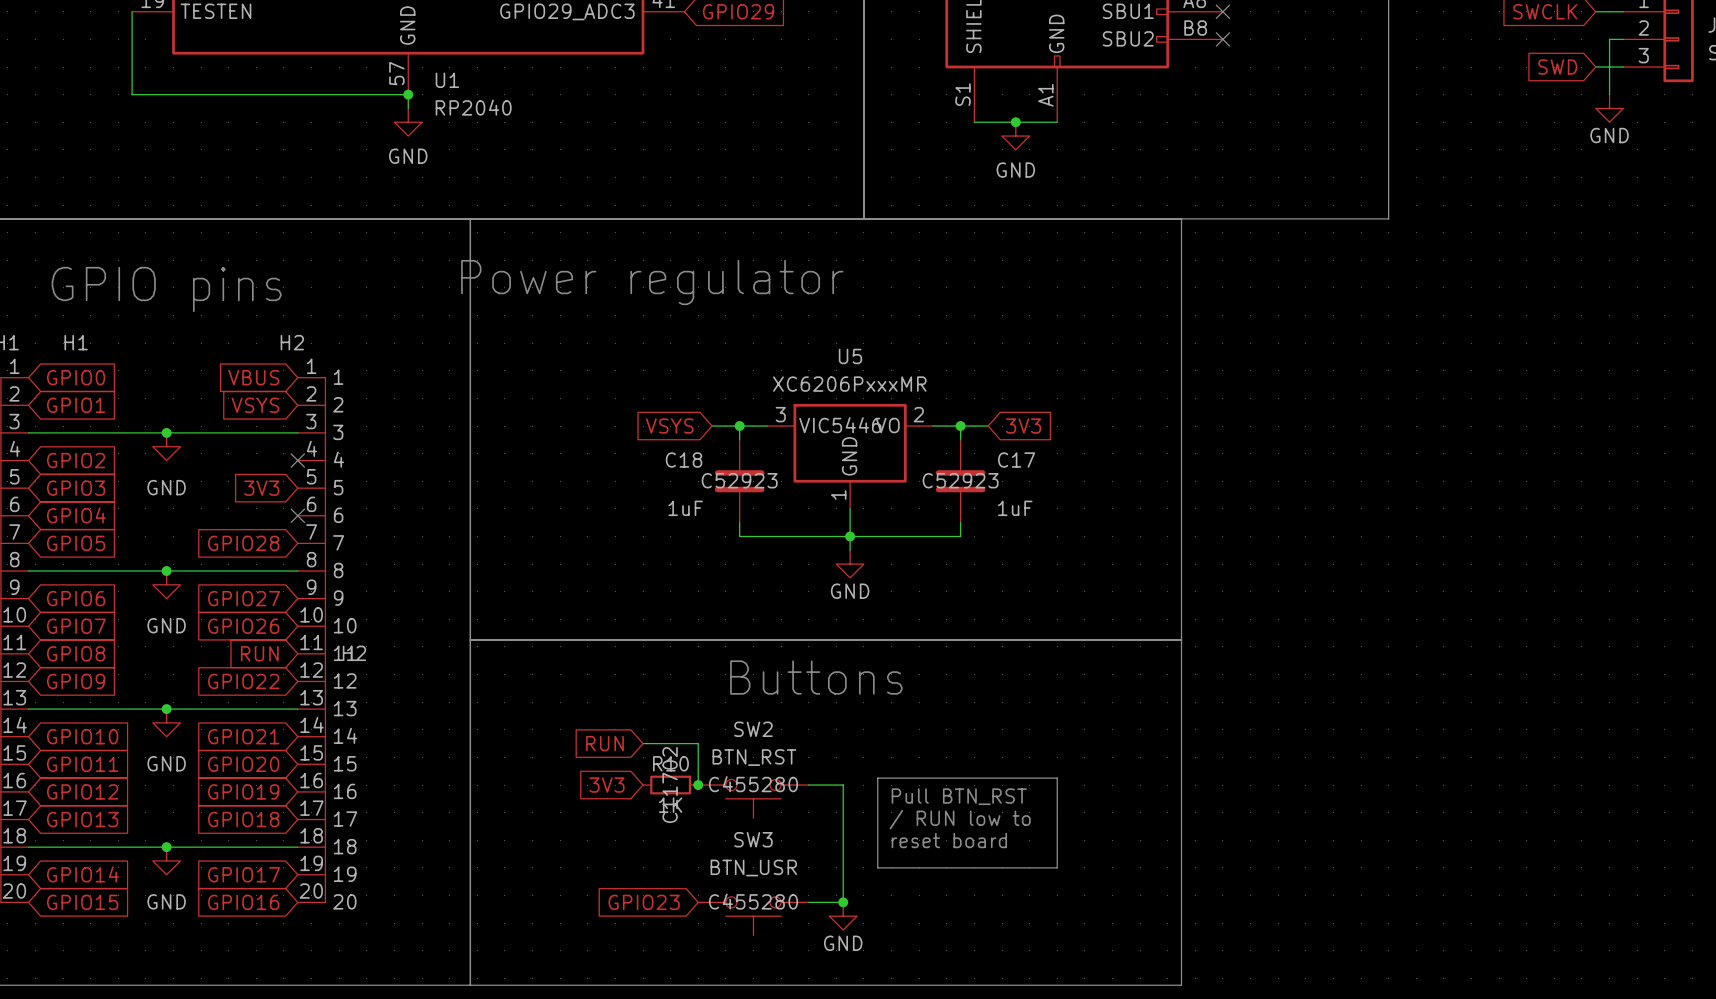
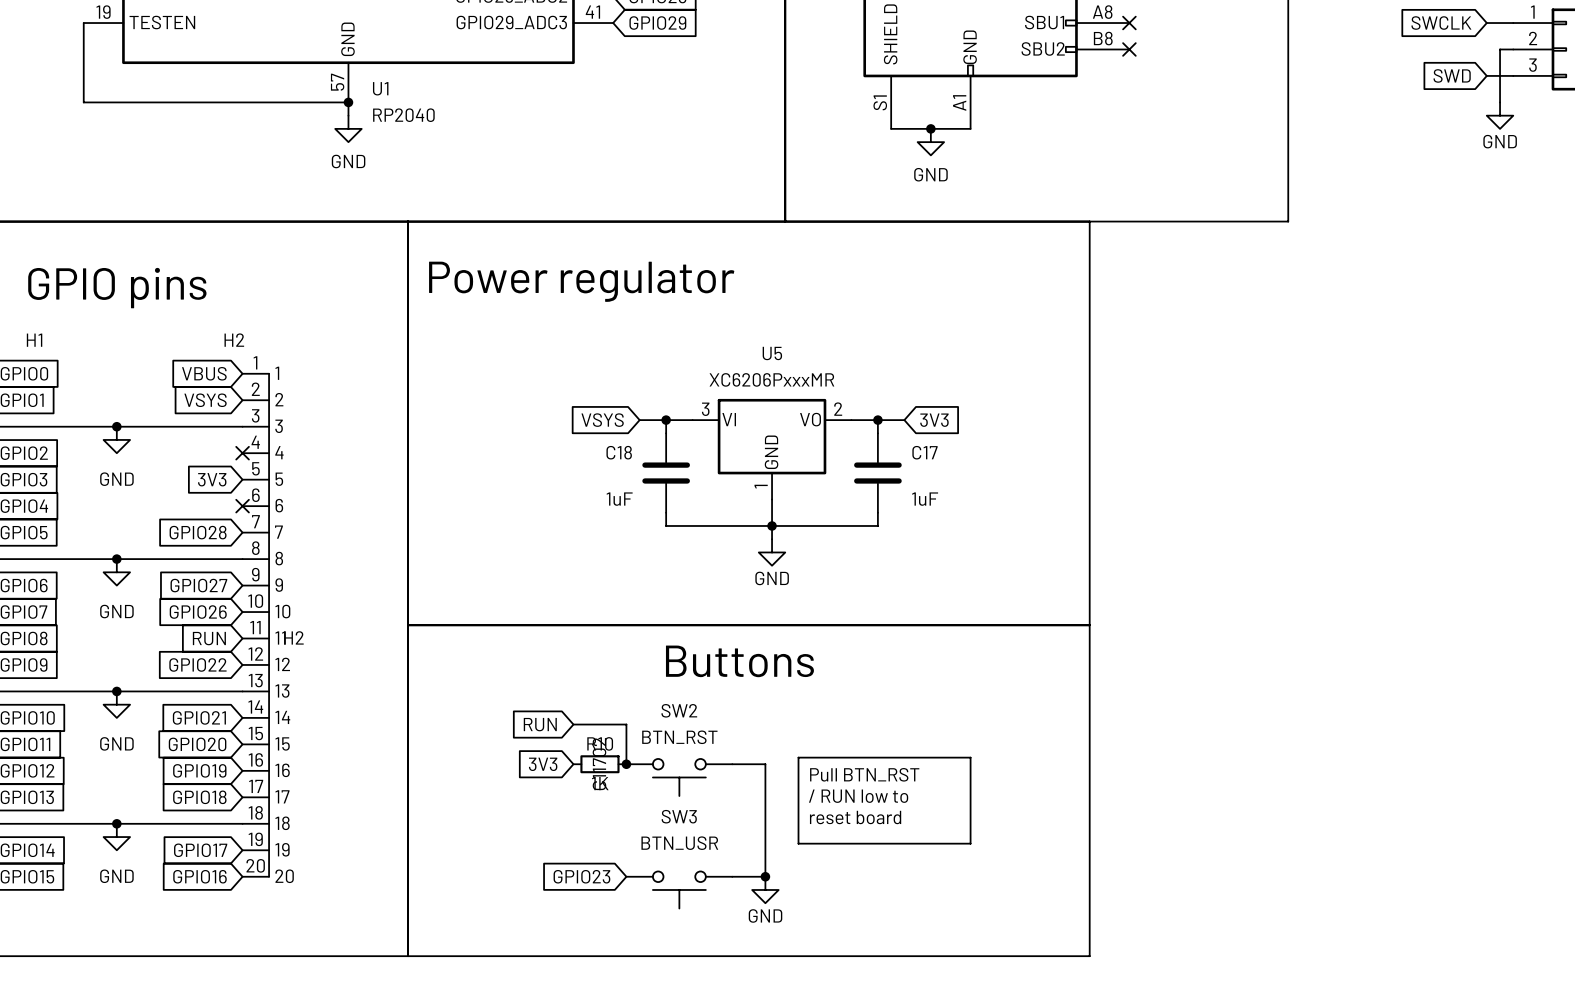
U5 text: C5446 (850, 425) -> none
C18 text: C52923 (739, 480) -> none
C17 text: C52923 (960, 480) -> none
SW2 text: C455280 (753, 784) -> none
SW3 text: C455280 (753, 901) -> none

